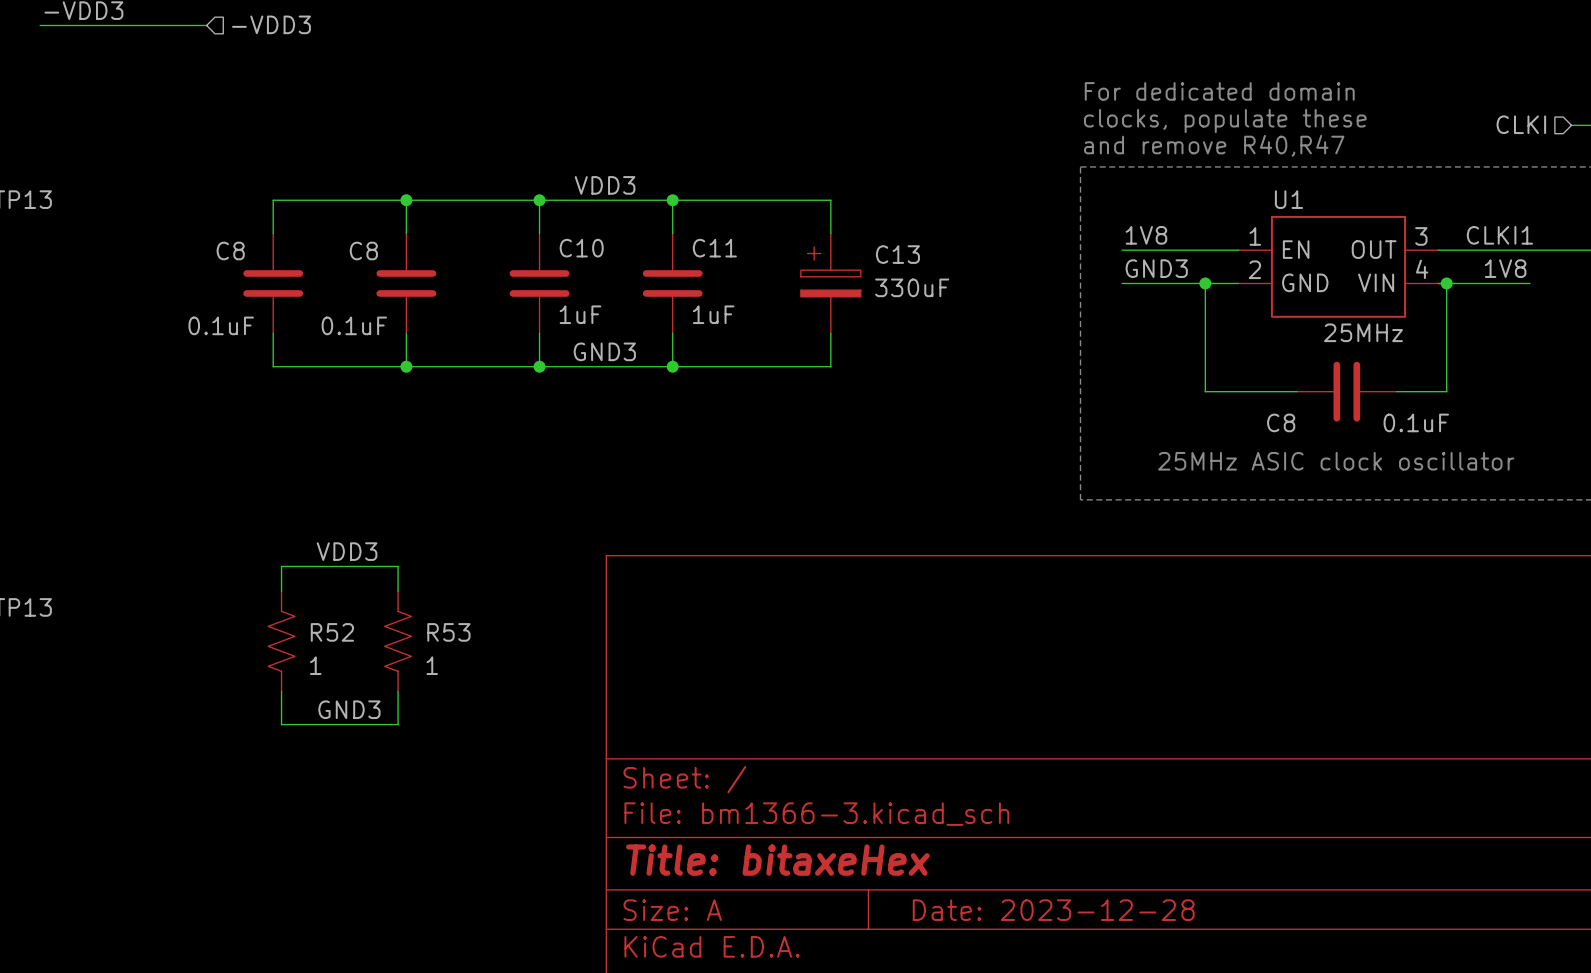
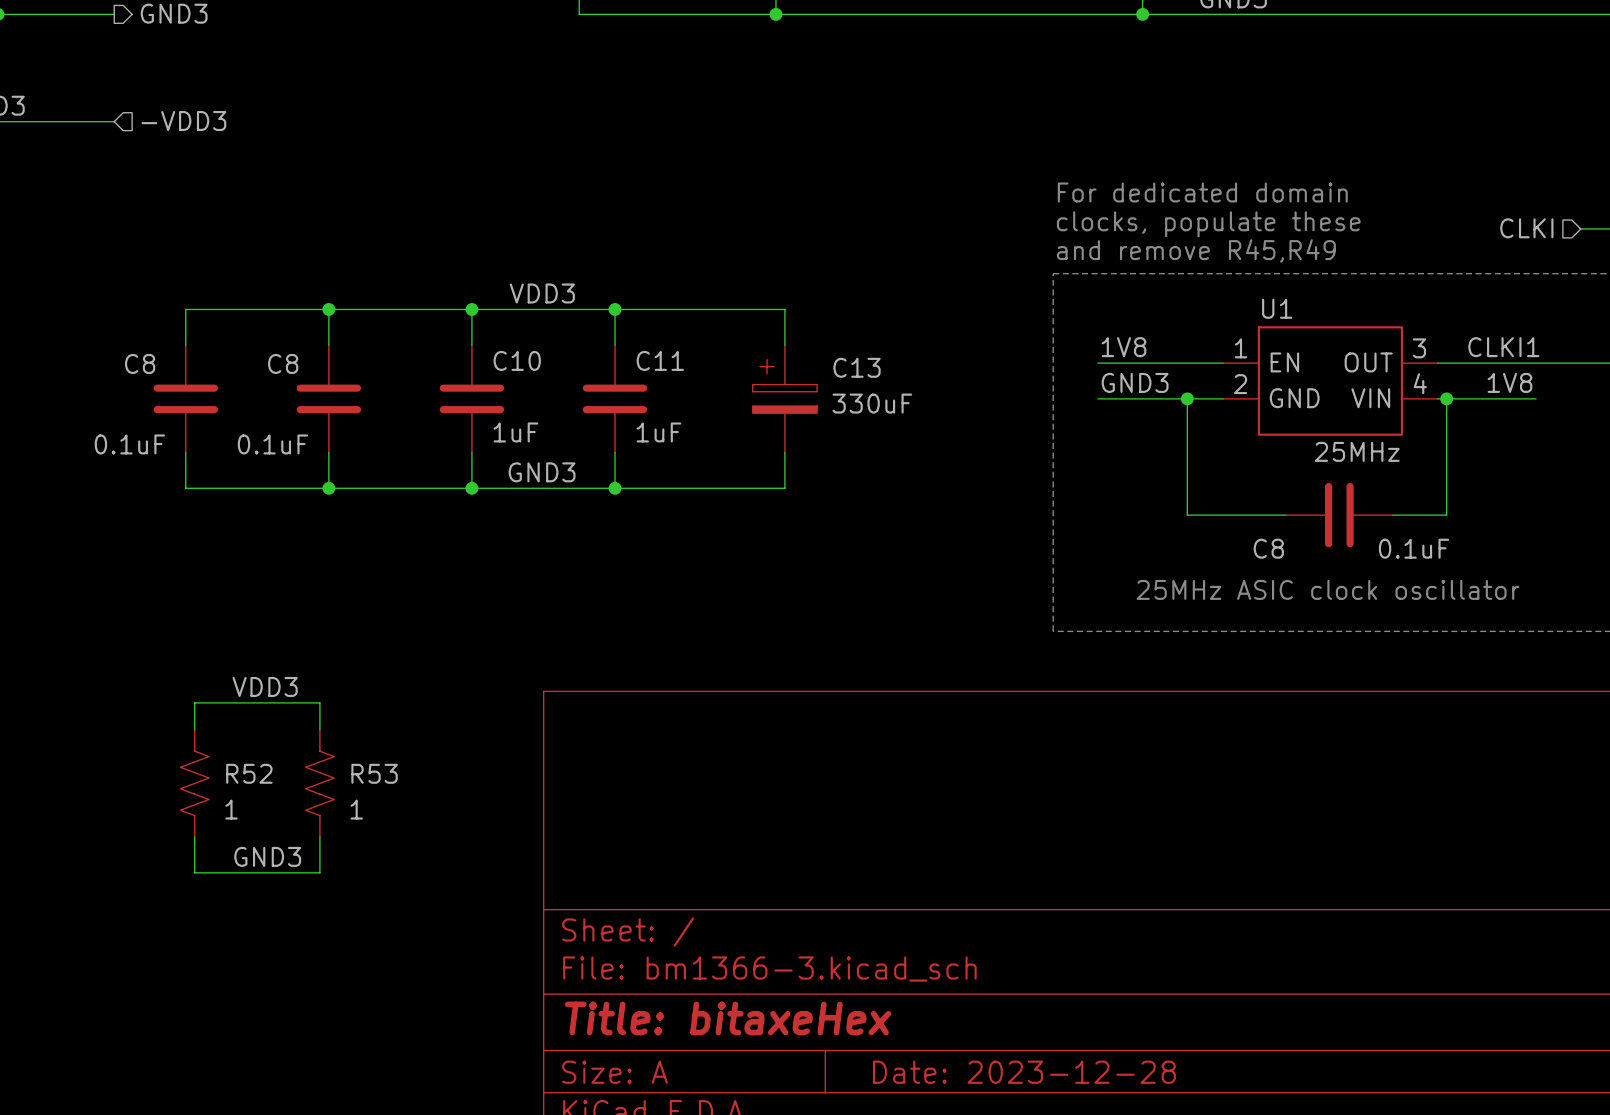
text: and remove R40,R47 (1214, 145) -> and remove R45,R49 (1196, 250)

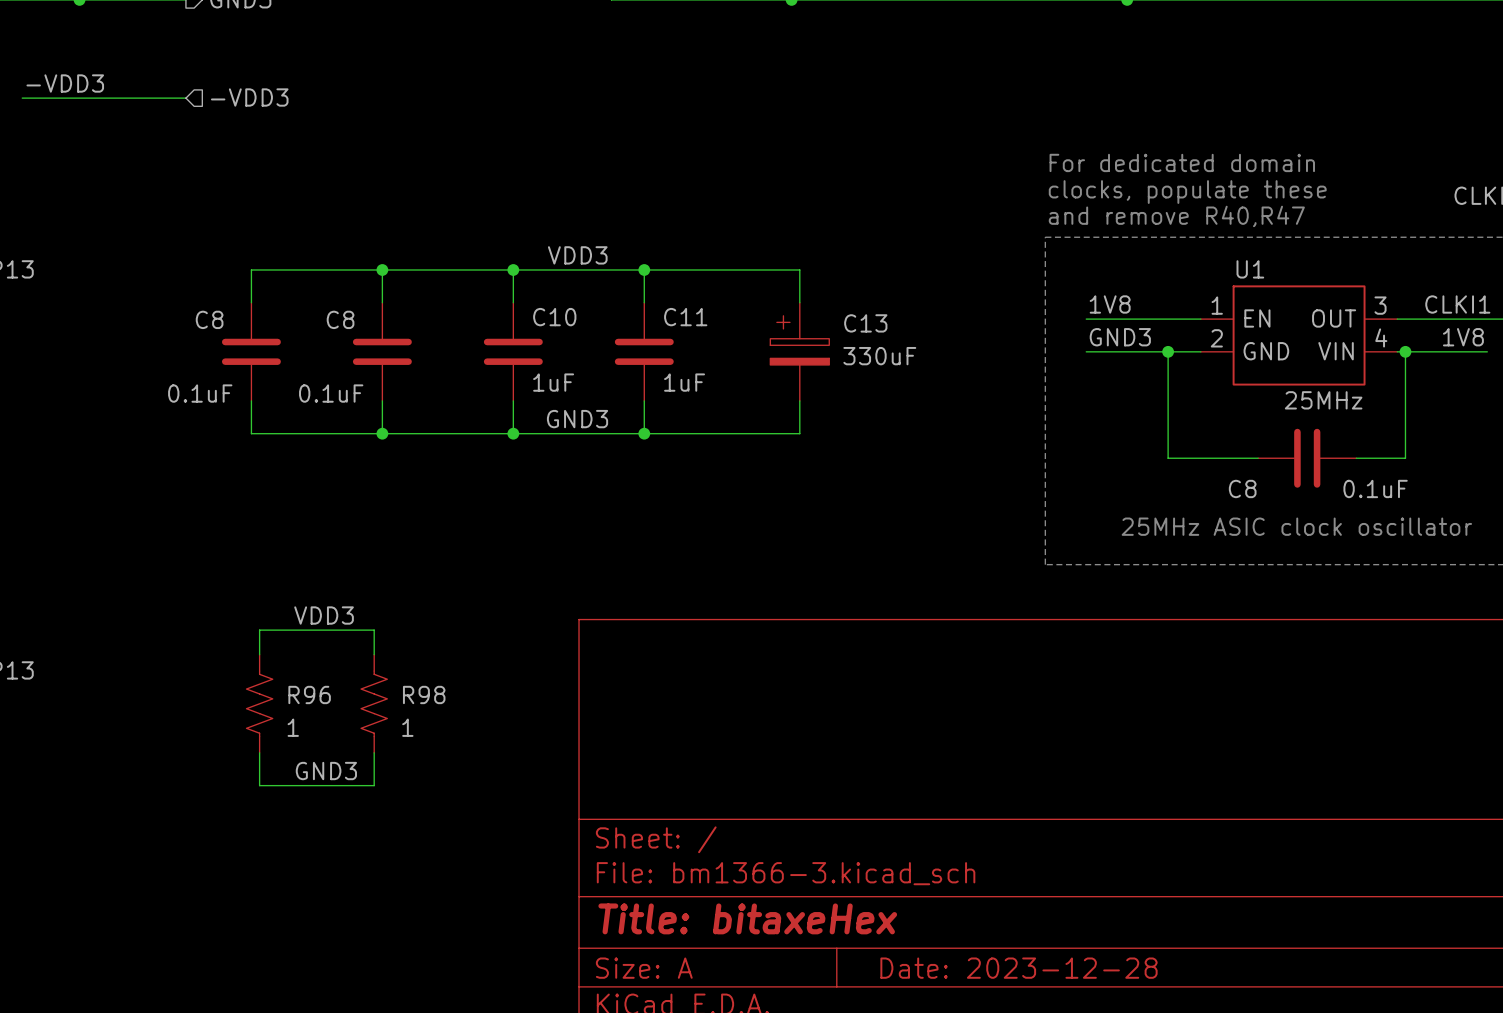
text: and remove R45,R49 (1196, 250) -> and remove R40,R47 (1176, 216)
R52 name: R52 (249, 773) -> R96 (309, 694)
R53 name: R53 (374, 773) -> R98 (424, 694)

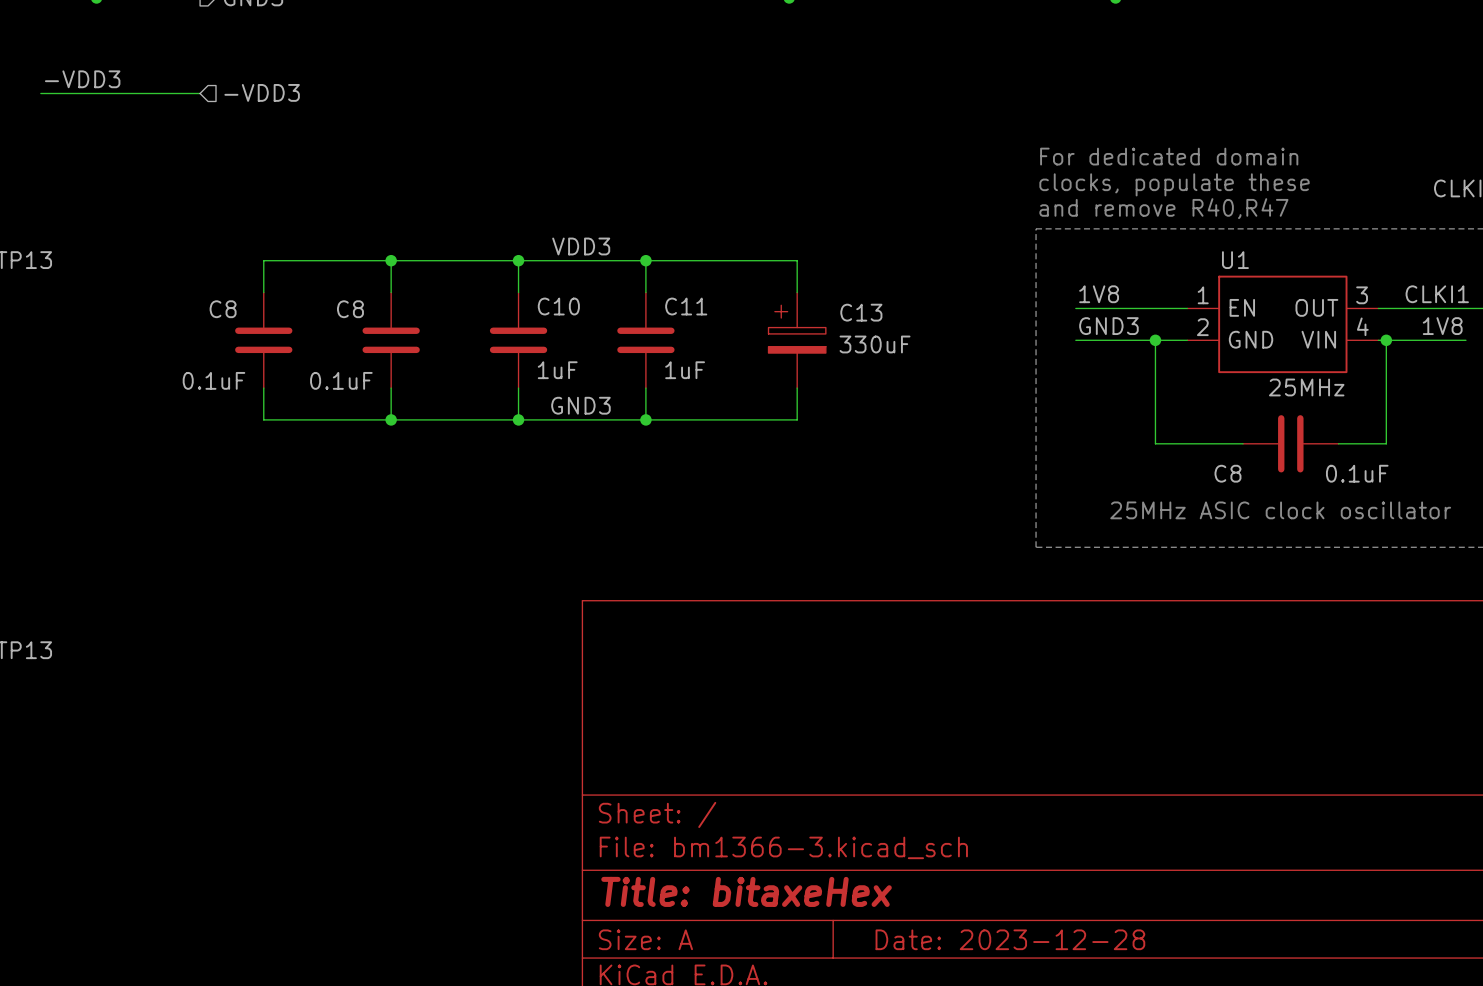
label: VDD3 (324, 615) -> none
wire: (259, 654) (259, 630) (374, 630) (374, 654) -> none
R96: 1 (259, 703) -> none
R98: 1 (374, 703) -> none
wire: (259, 752) (259, 785) (374, 785) (374, 752) -> none
label: GND3 (326, 771) -> none

